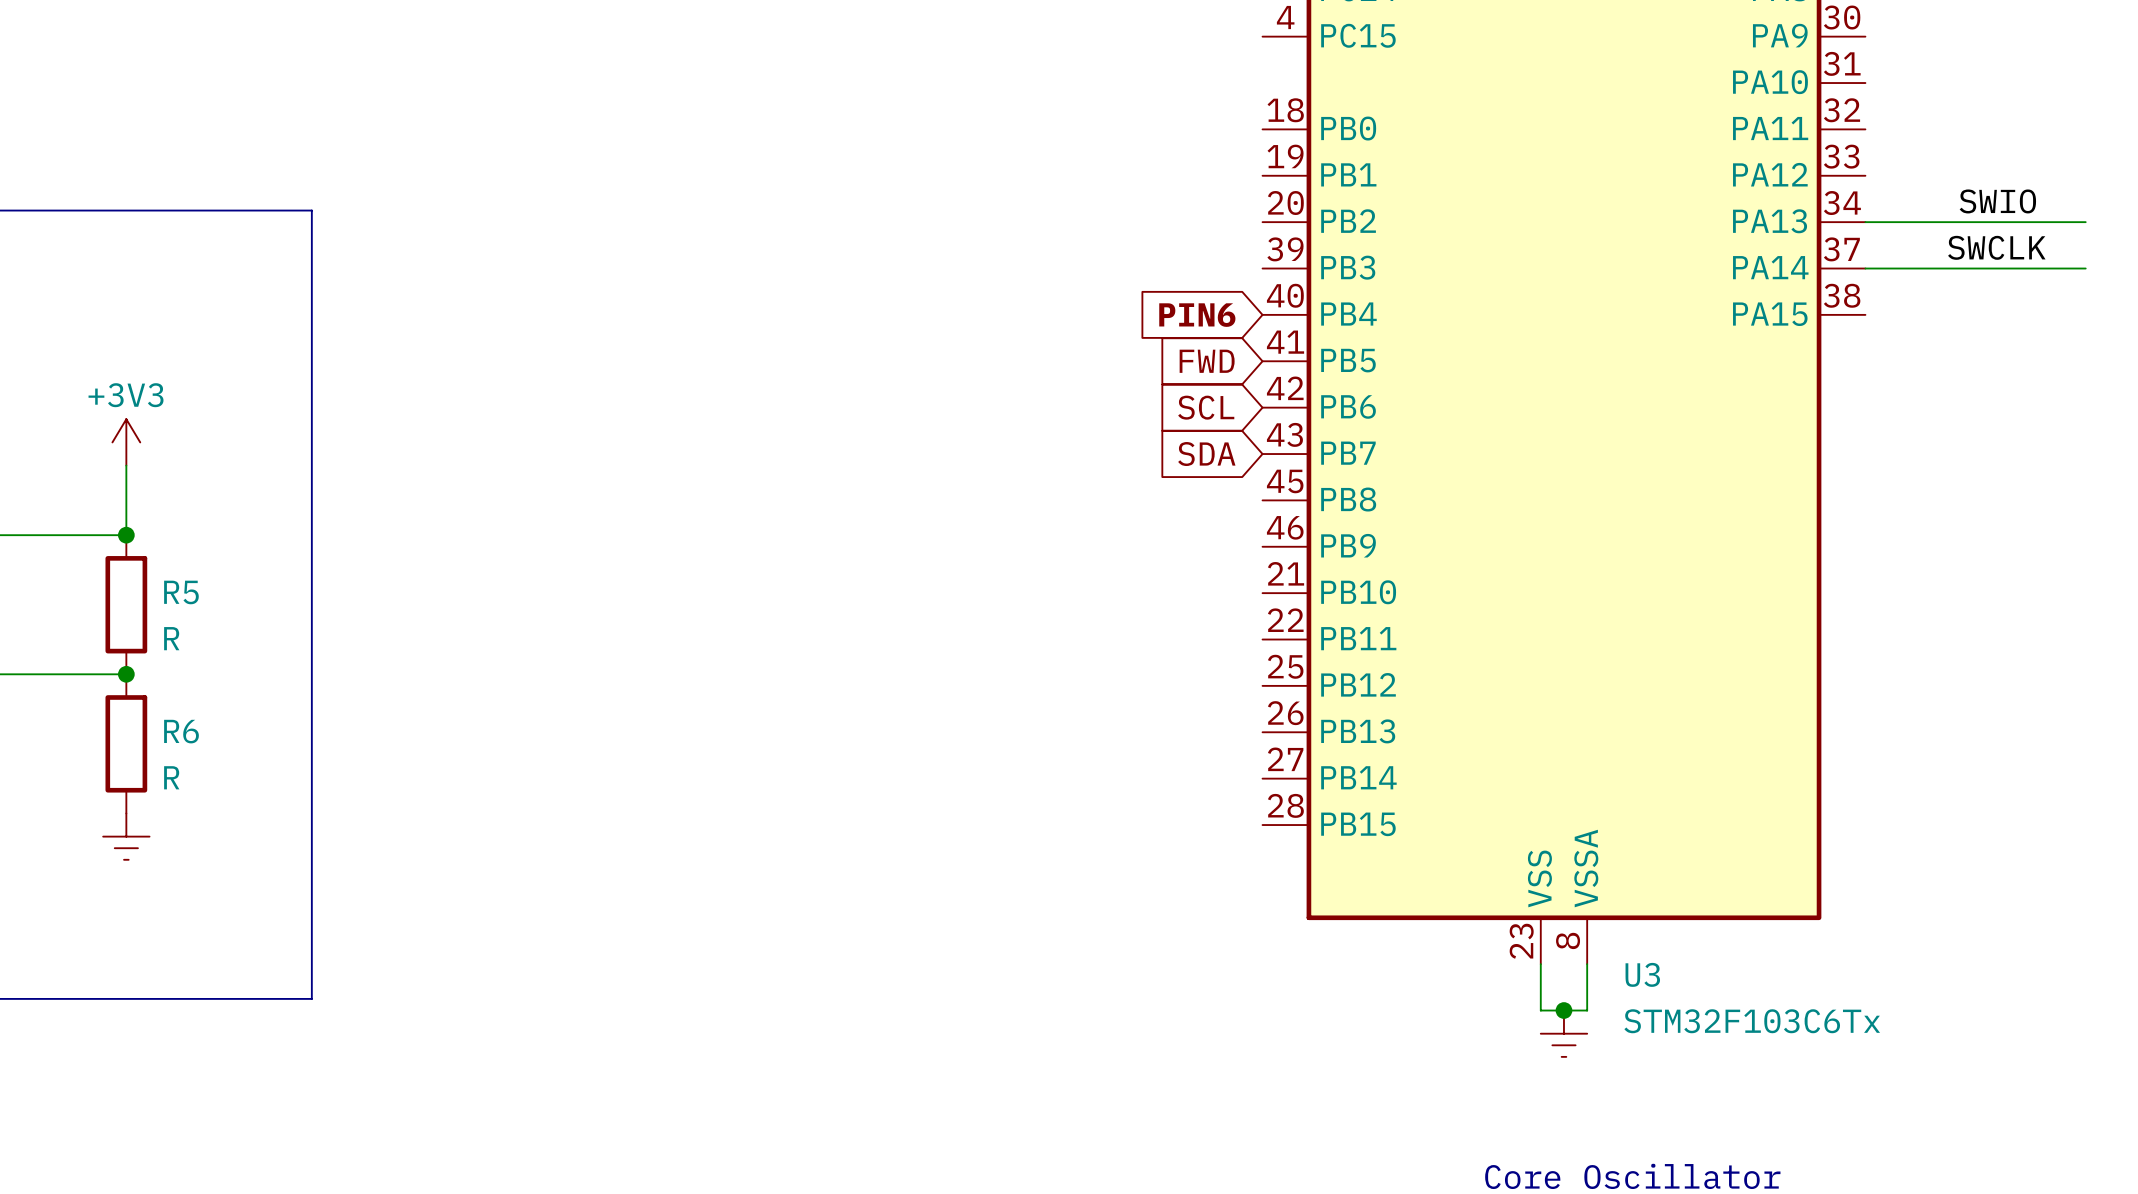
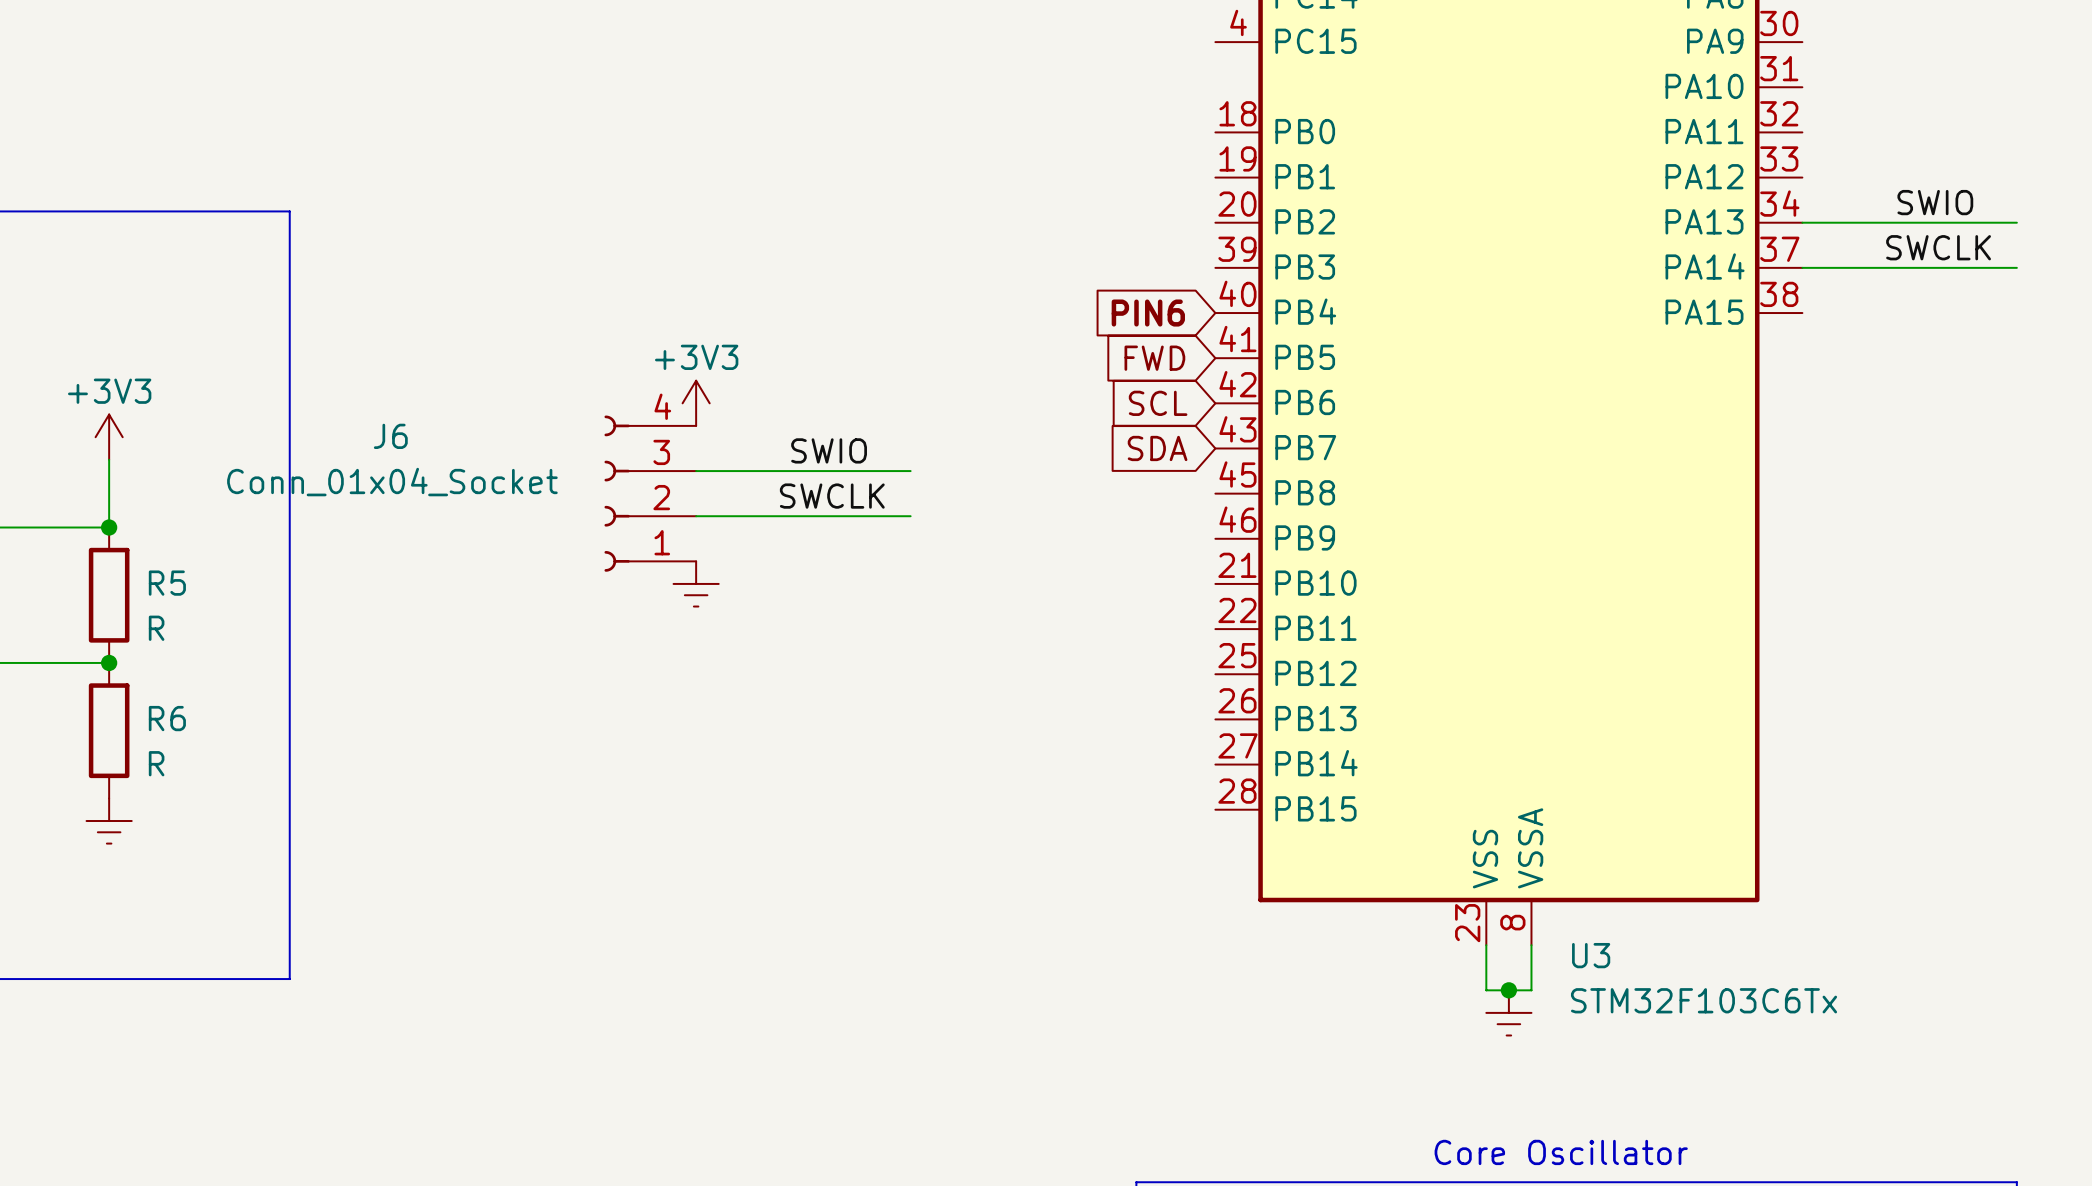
power symbol: none -> +3V3 (696, 403)
label: none -> SWIO (829, 450)
wire: none -> (696, 471) (910, 471)
J6: none -> Conn_01x04_Socket (650, 493)
label: none -> SWCLK (832, 496)
wire: none -> (696, 516) (910, 516)
power symbol: none -> (696, 583)

